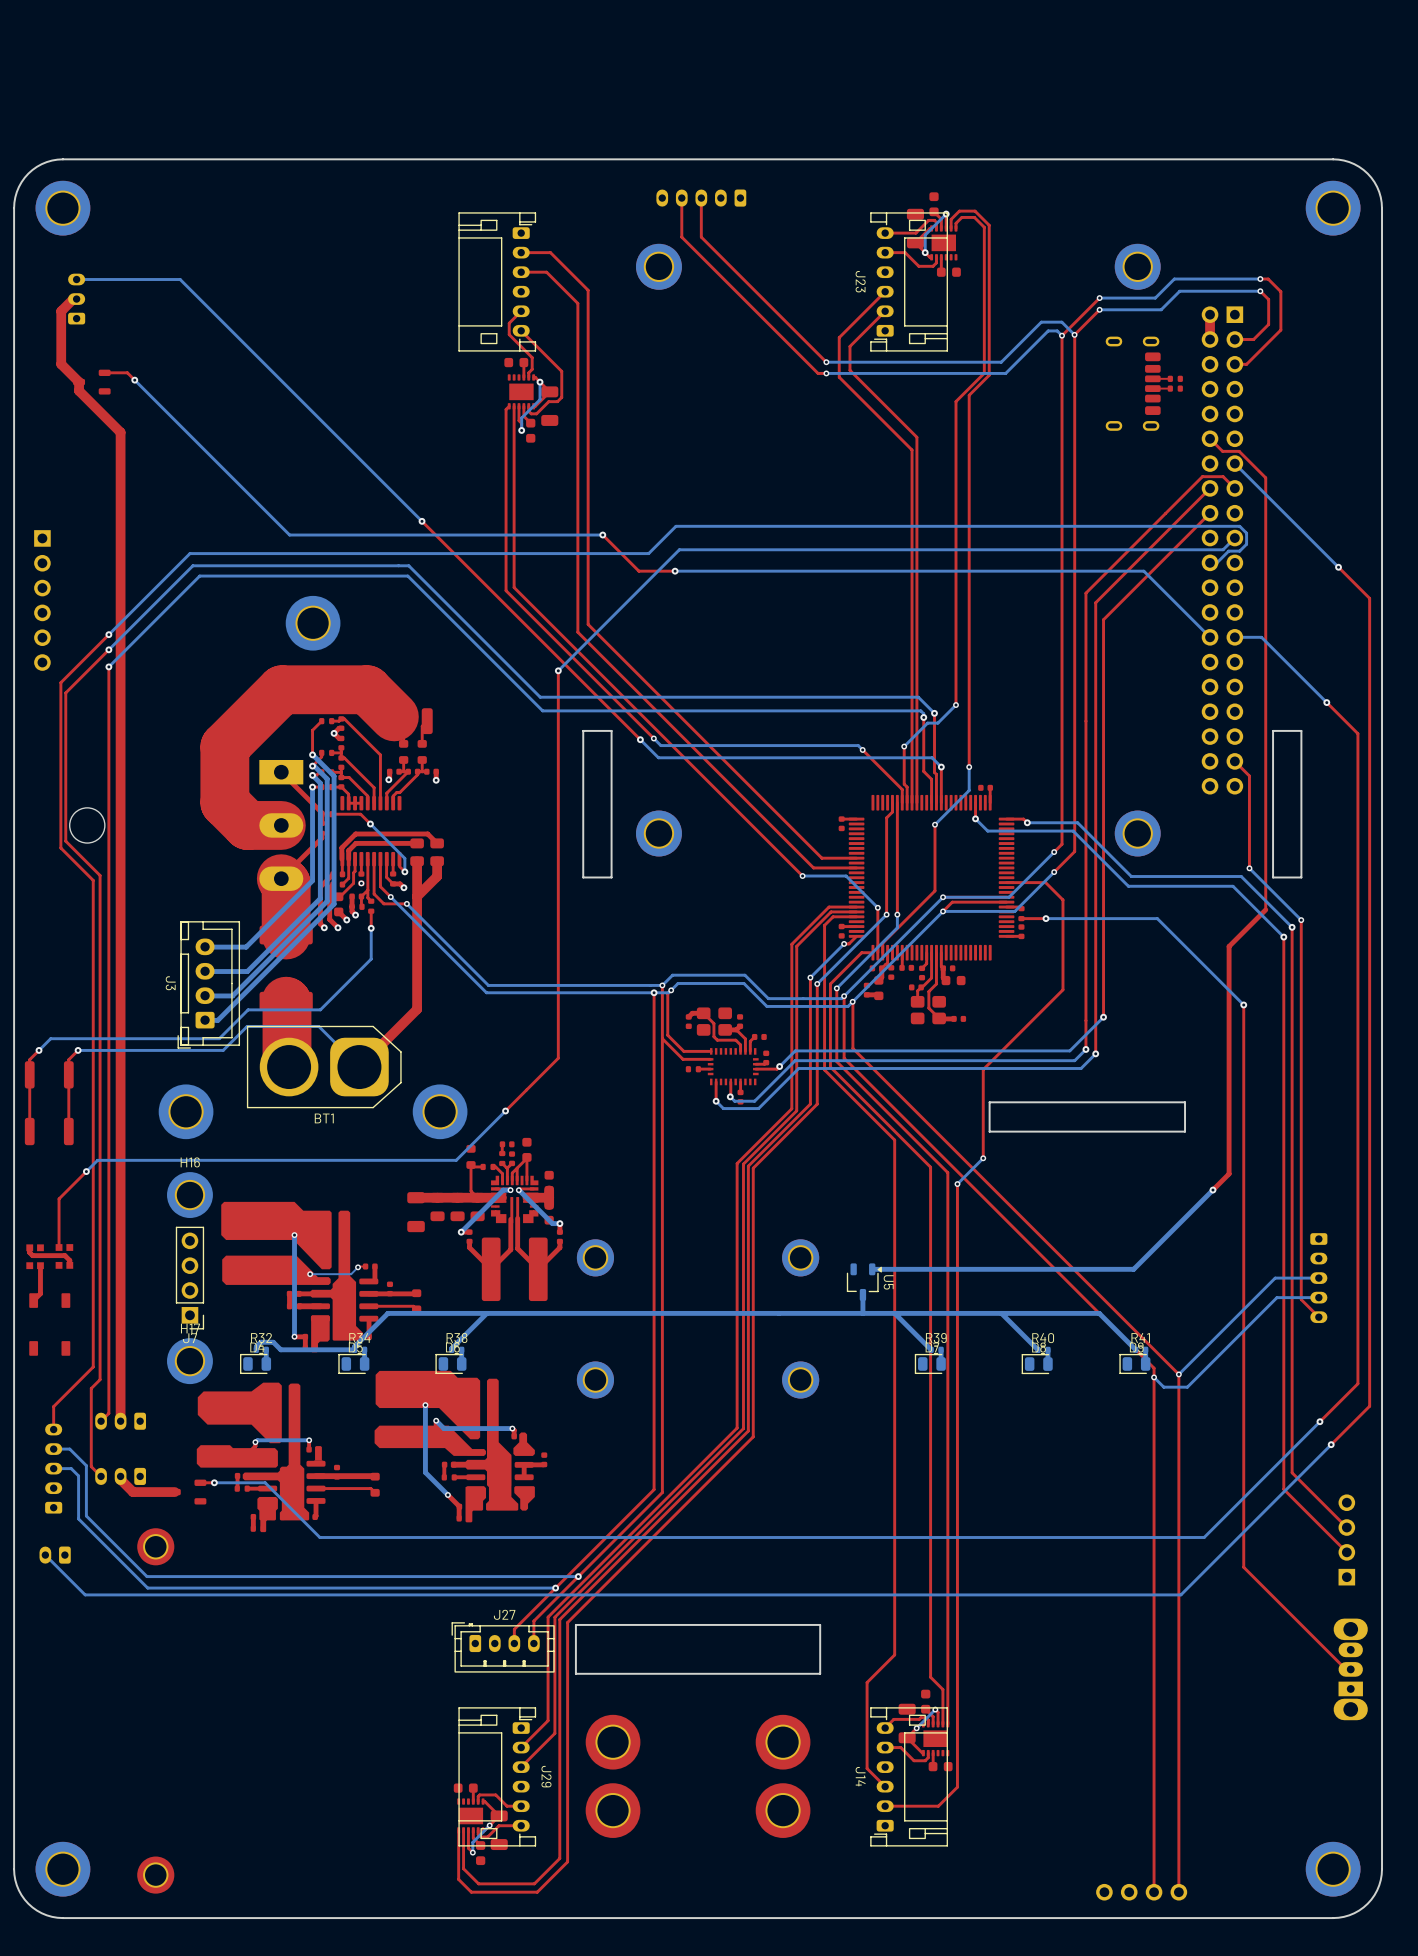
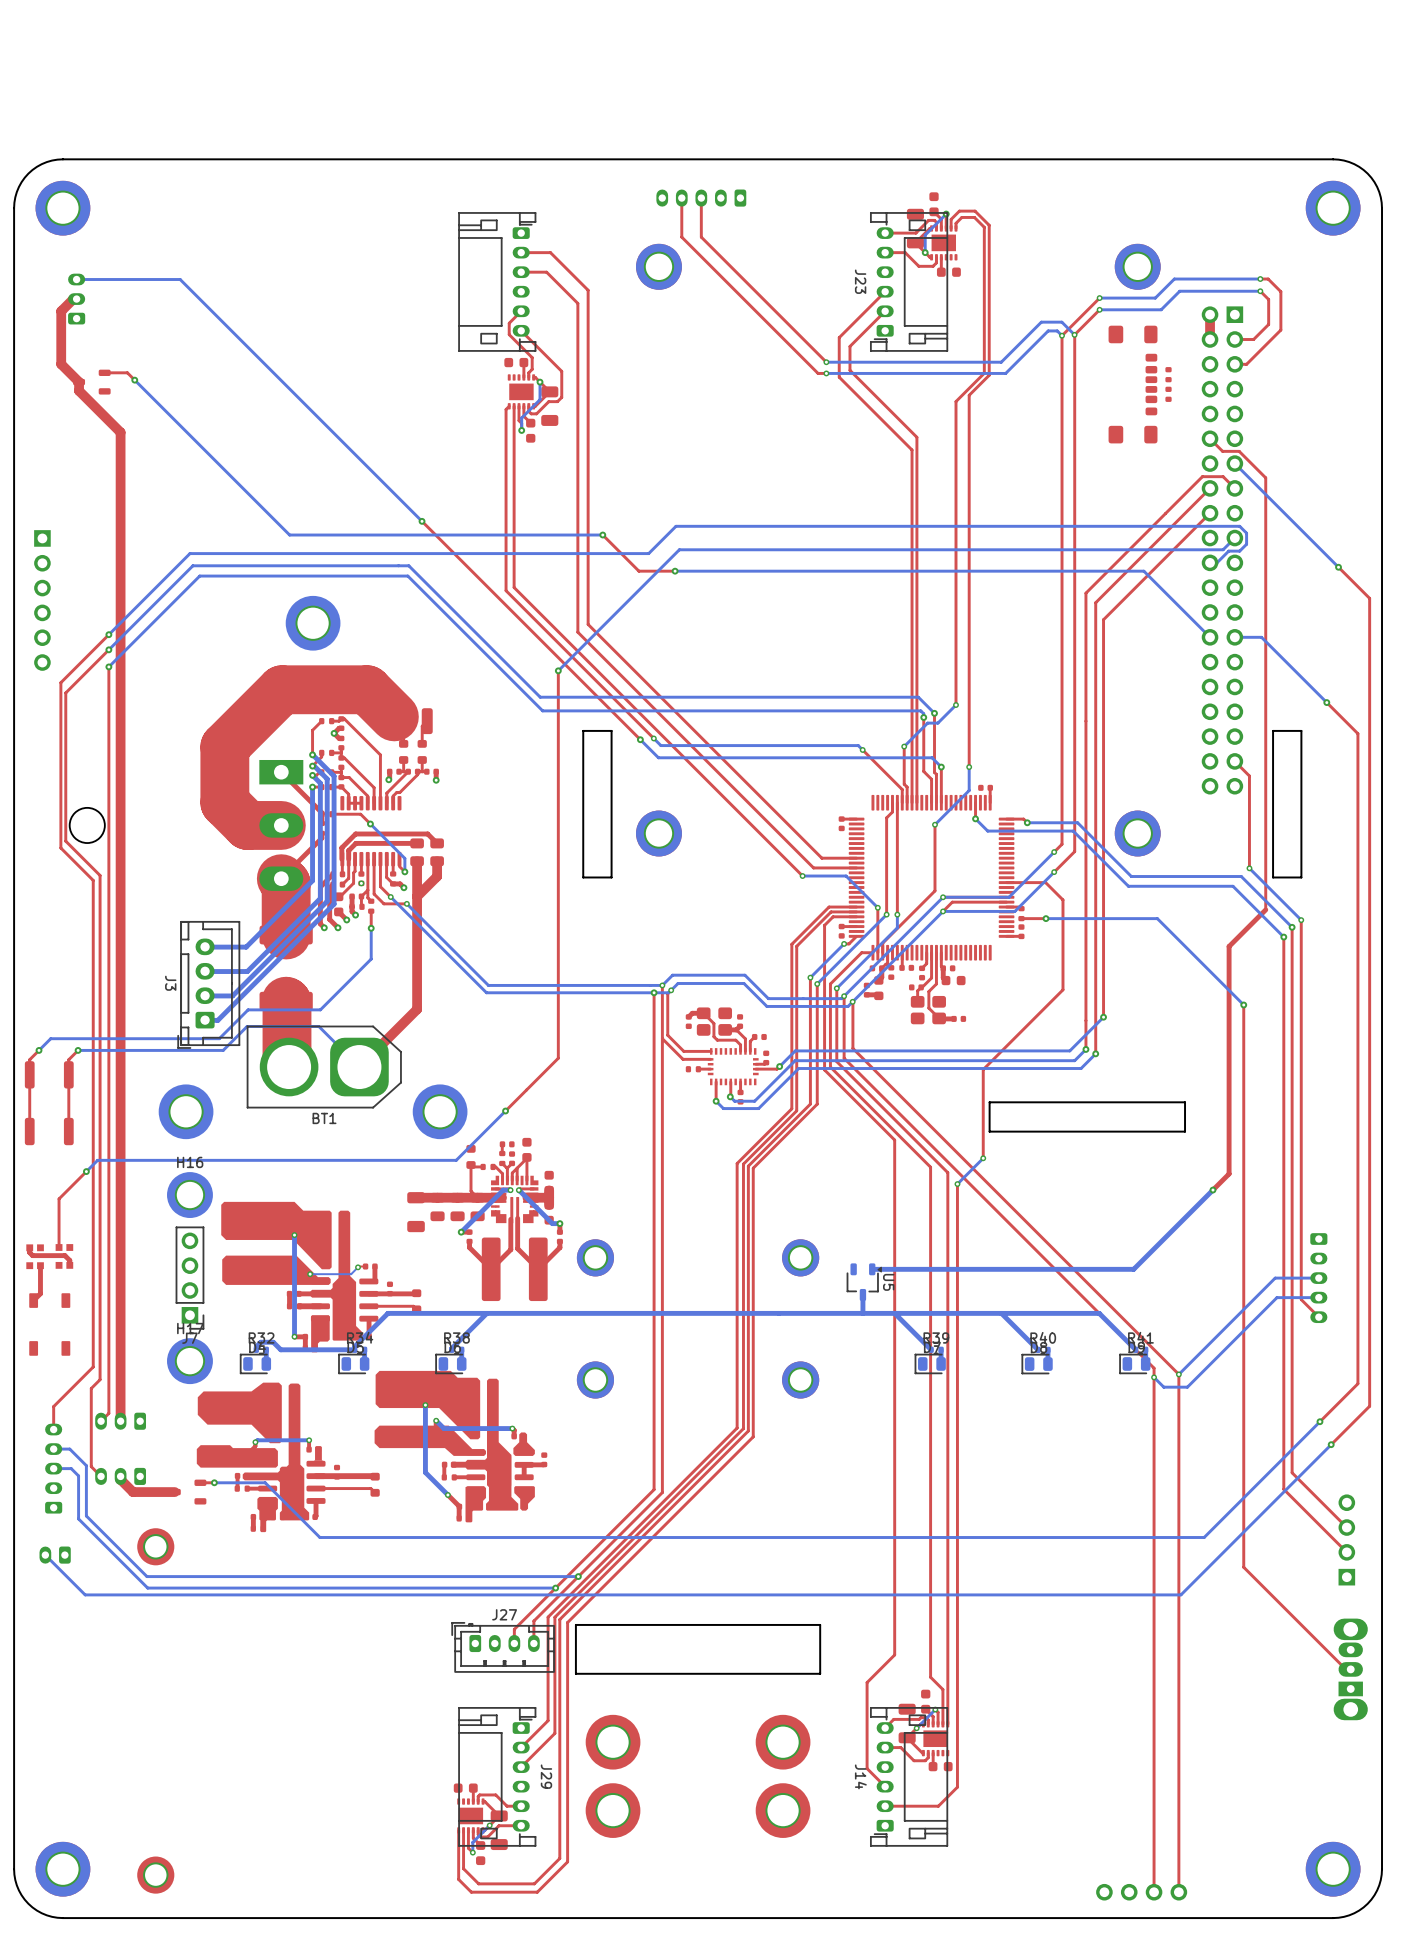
part footprint: [1105, 336, 1161, 431] -> [1108, 325, 1158, 444]
part: none -> (1168, 374)
top track: (1170, 378) (1152, 378) -> none
part: (1175, 378) -> none
top track: (1170, 388) (1152, 388) -> none
part: (1175, 388) -> none
part: none -> (1168, 394)

